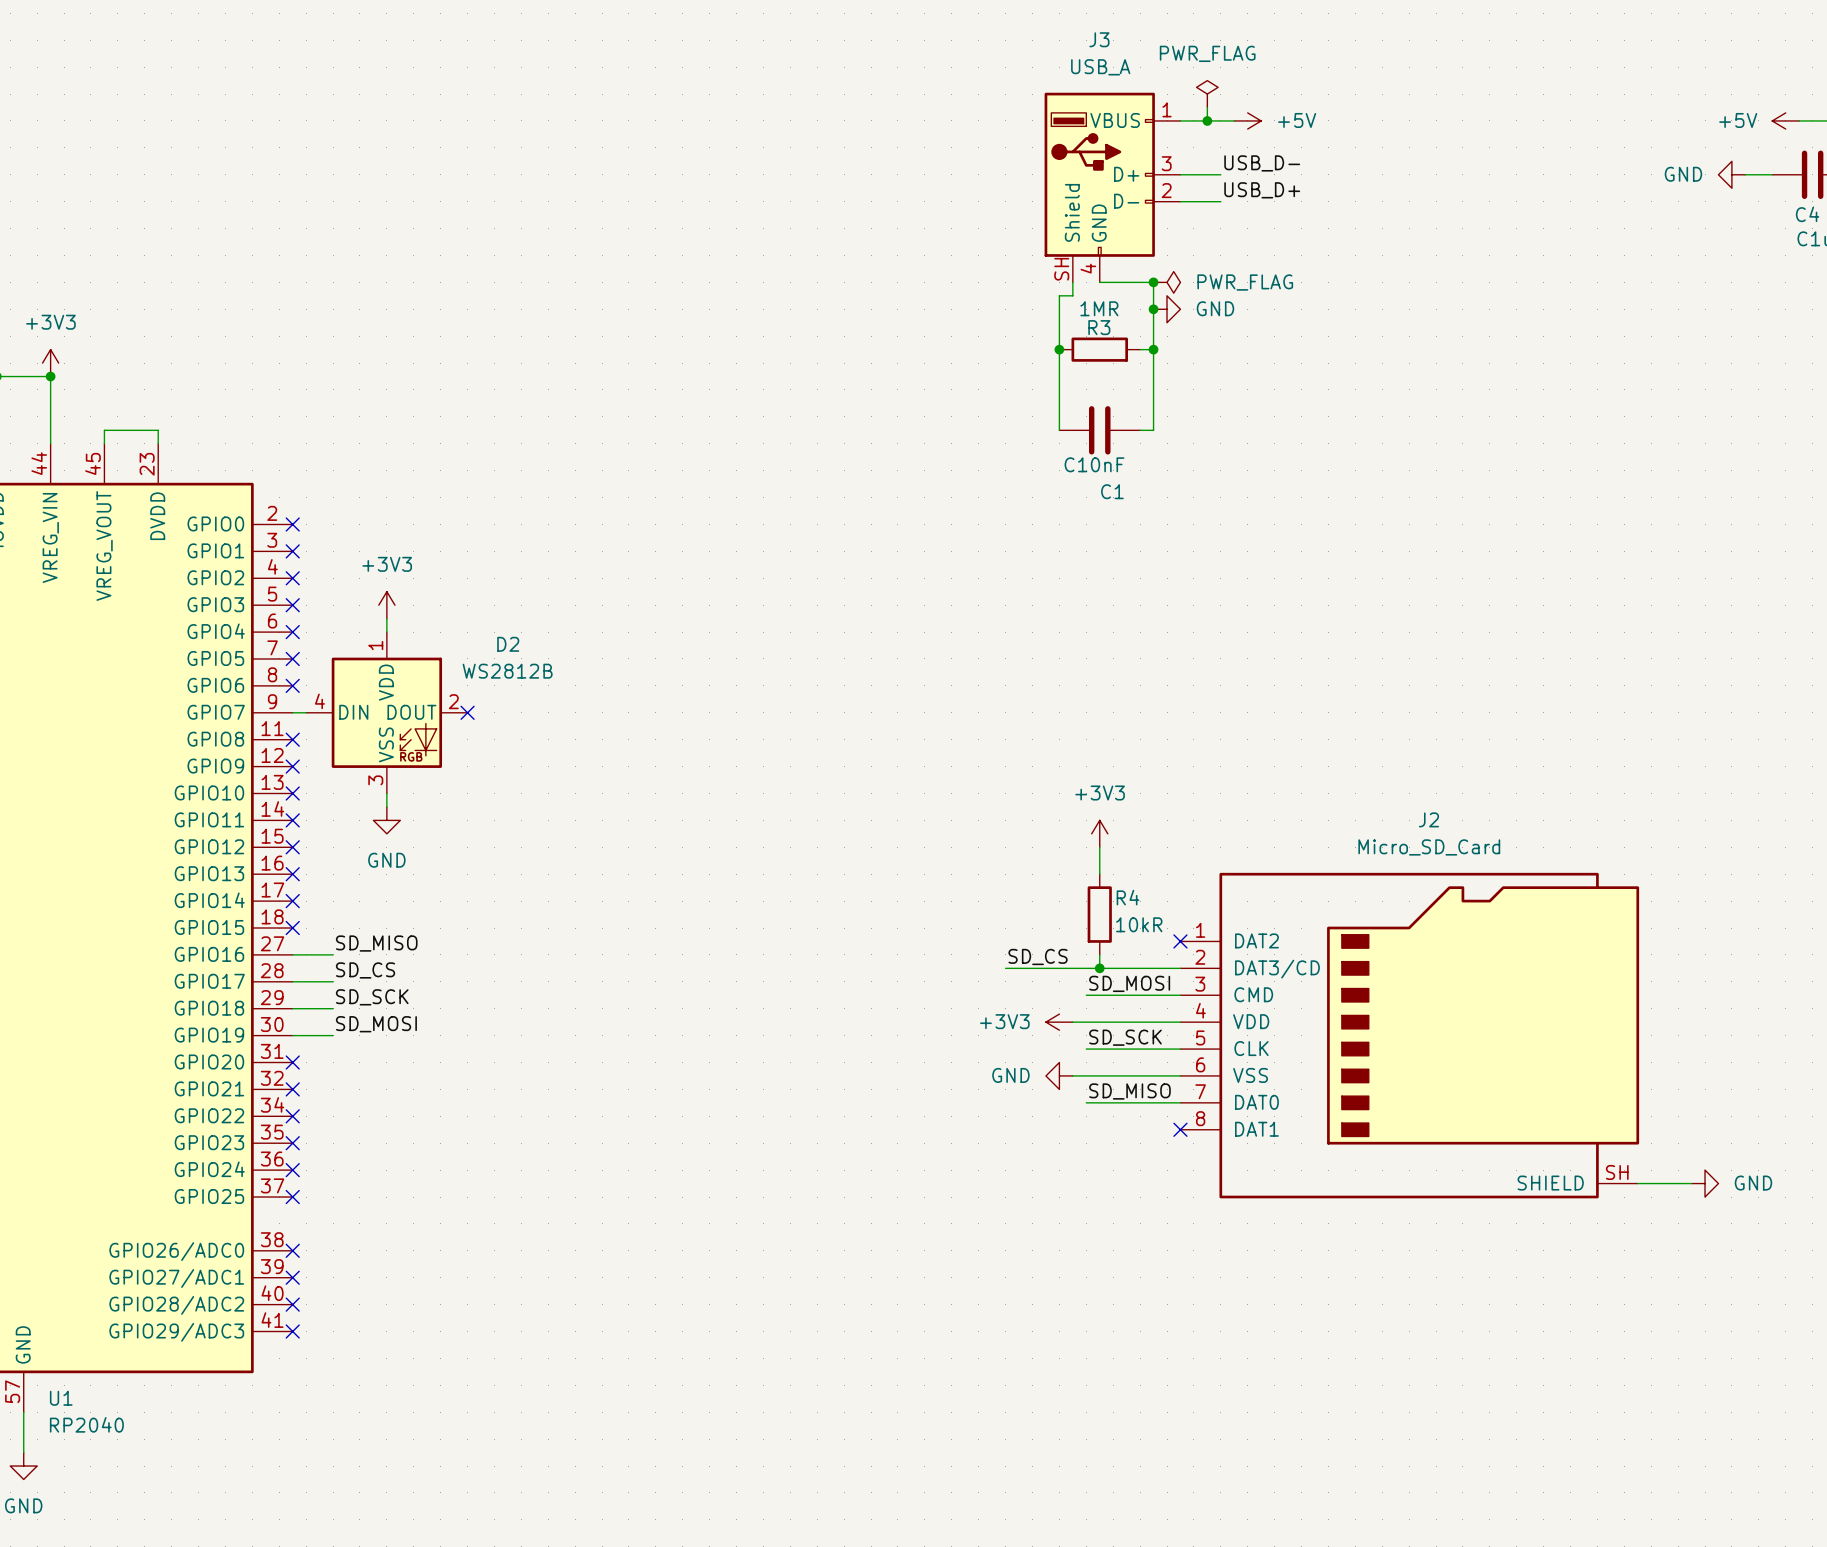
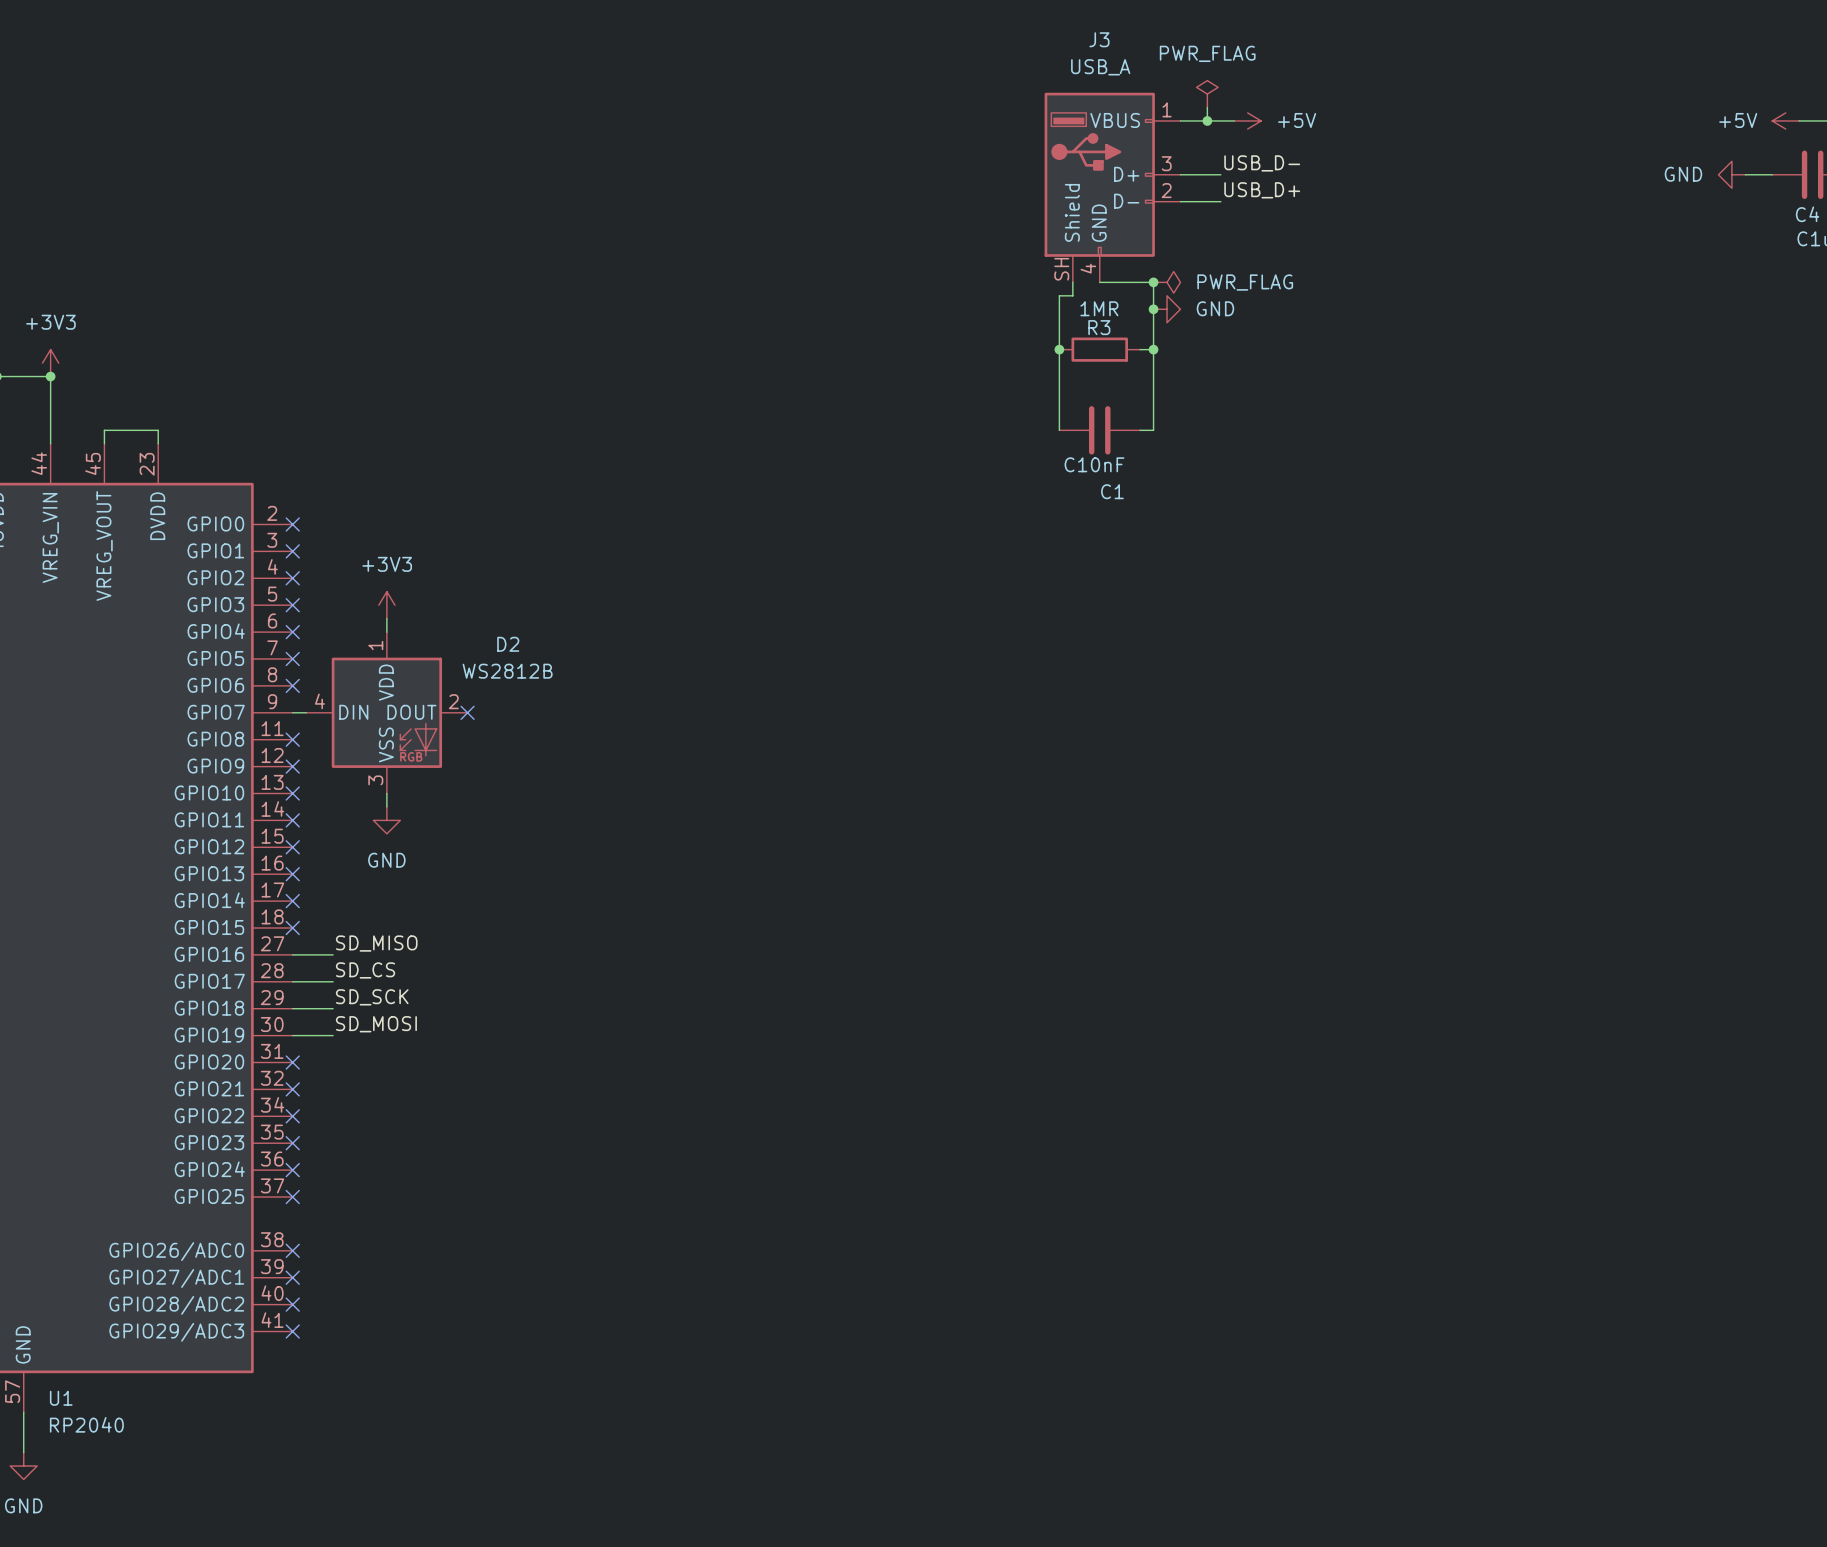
power symbol: +3V3 (1099, 833) -> none
wire: (1099, 847) (1099, 874) -> none
R4: 10kR (1099, 914) -> none
no-connect mark: (1180, 941) -> none
wire: (1099, 954) (1099, 968) -> none
label: SD_CS (1038, 956) -> none
wire: (1005, 968) (1180, 968) -> none
junction: (1099, 968) -> none
label: SD_MOSI (1129, 983) -> none
wire: (1086, 995) (1180, 995) -> none
power symbol: +3V3 (1059, 1022) -> none
wire: (1072, 1022) (1180, 1022) -> none
J2: Micro_SD_Card (1409, 1035) -> none
label: SD_SCK (1125, 1037) -> none
wire: (1086, 1049) (1180, 1049) -> none
power symbol: GND (1059, 1075) -> none
wire: (1072, 1075) (1180, 1075) -> none
label: SD_MISO (1129, 1091) -> none
wire: (1086, 1102) (1180, 1102) -> none
no-connect mark: (1180, 1129) -> none
wire: (1637, 1183) (1691, 1183) -> none
power symbol: GND (1705, 1183) -> none

